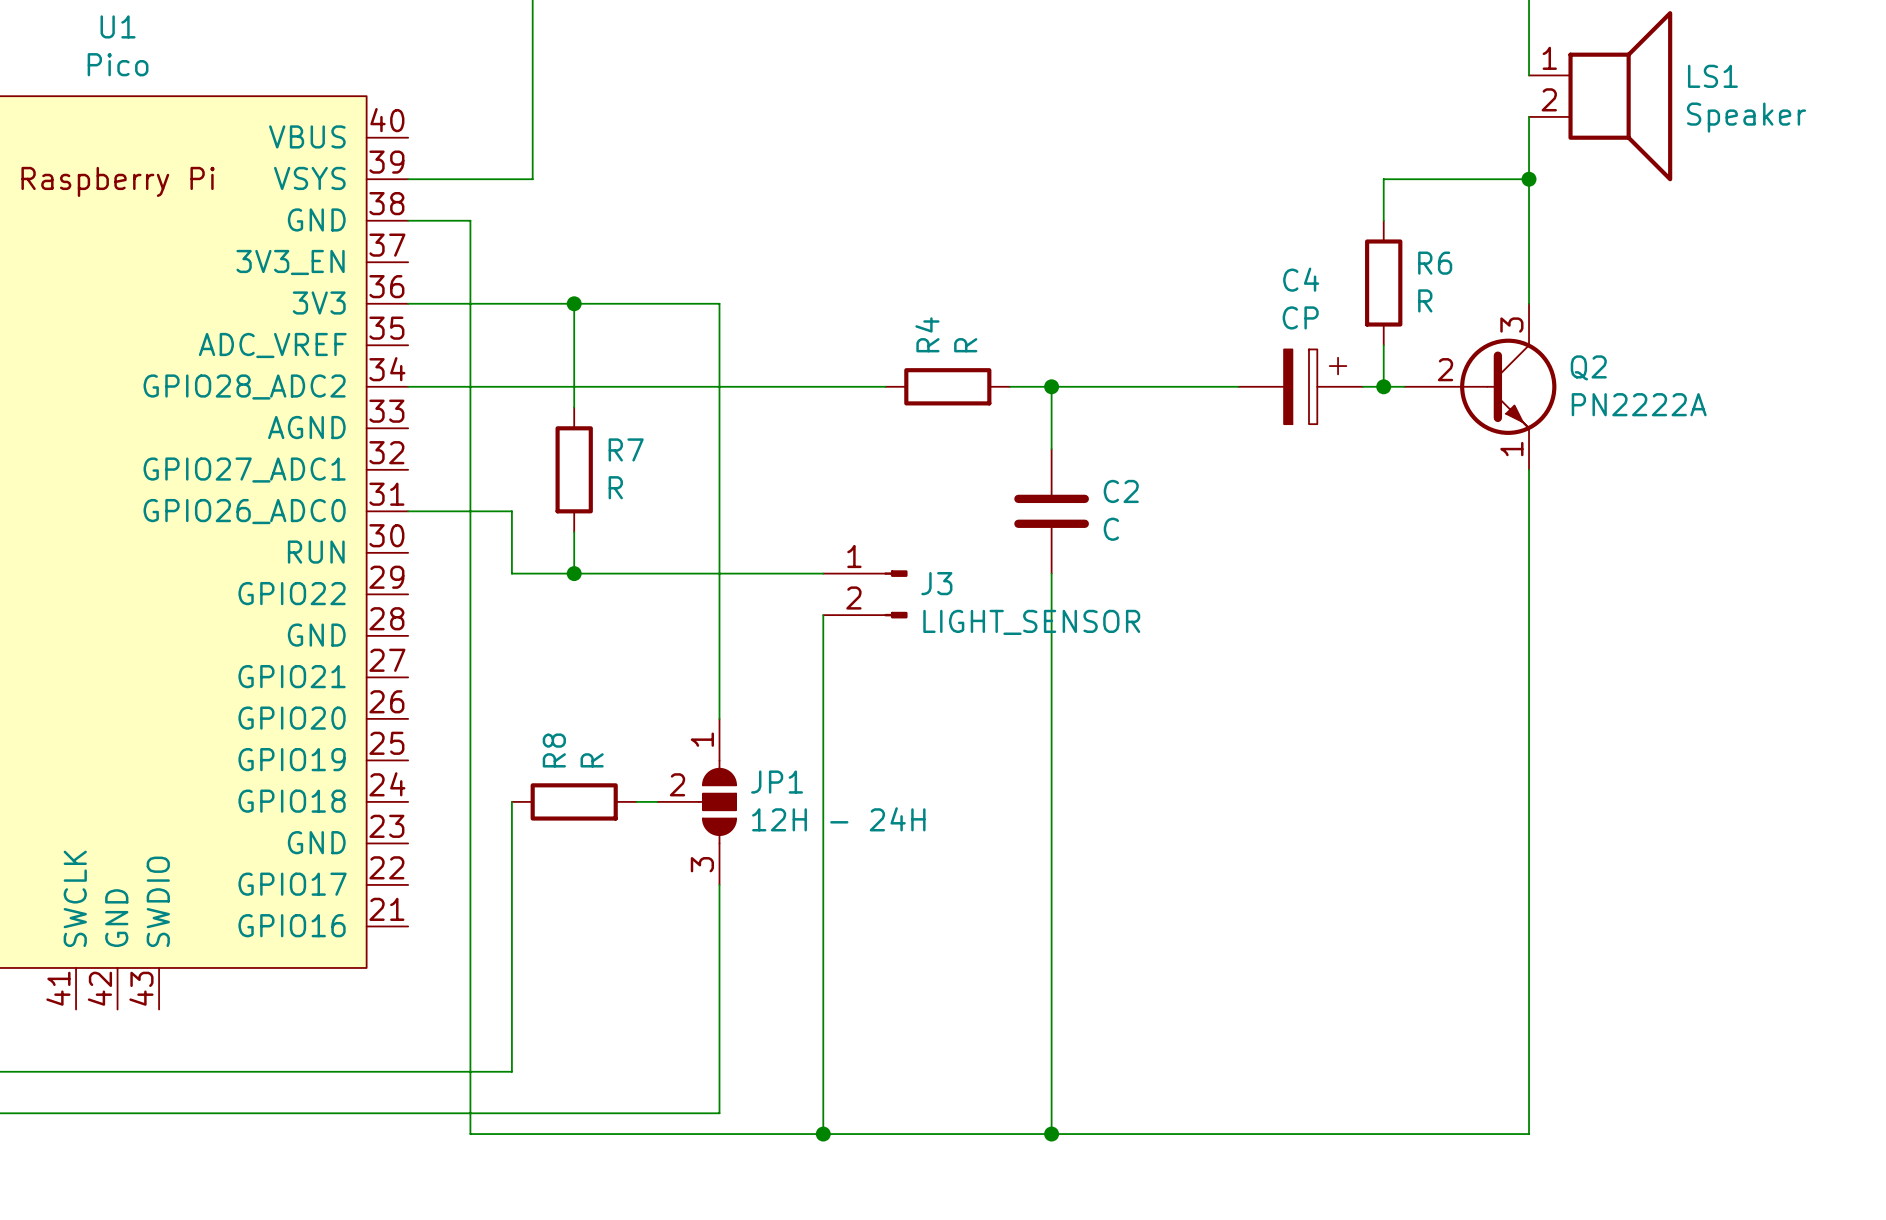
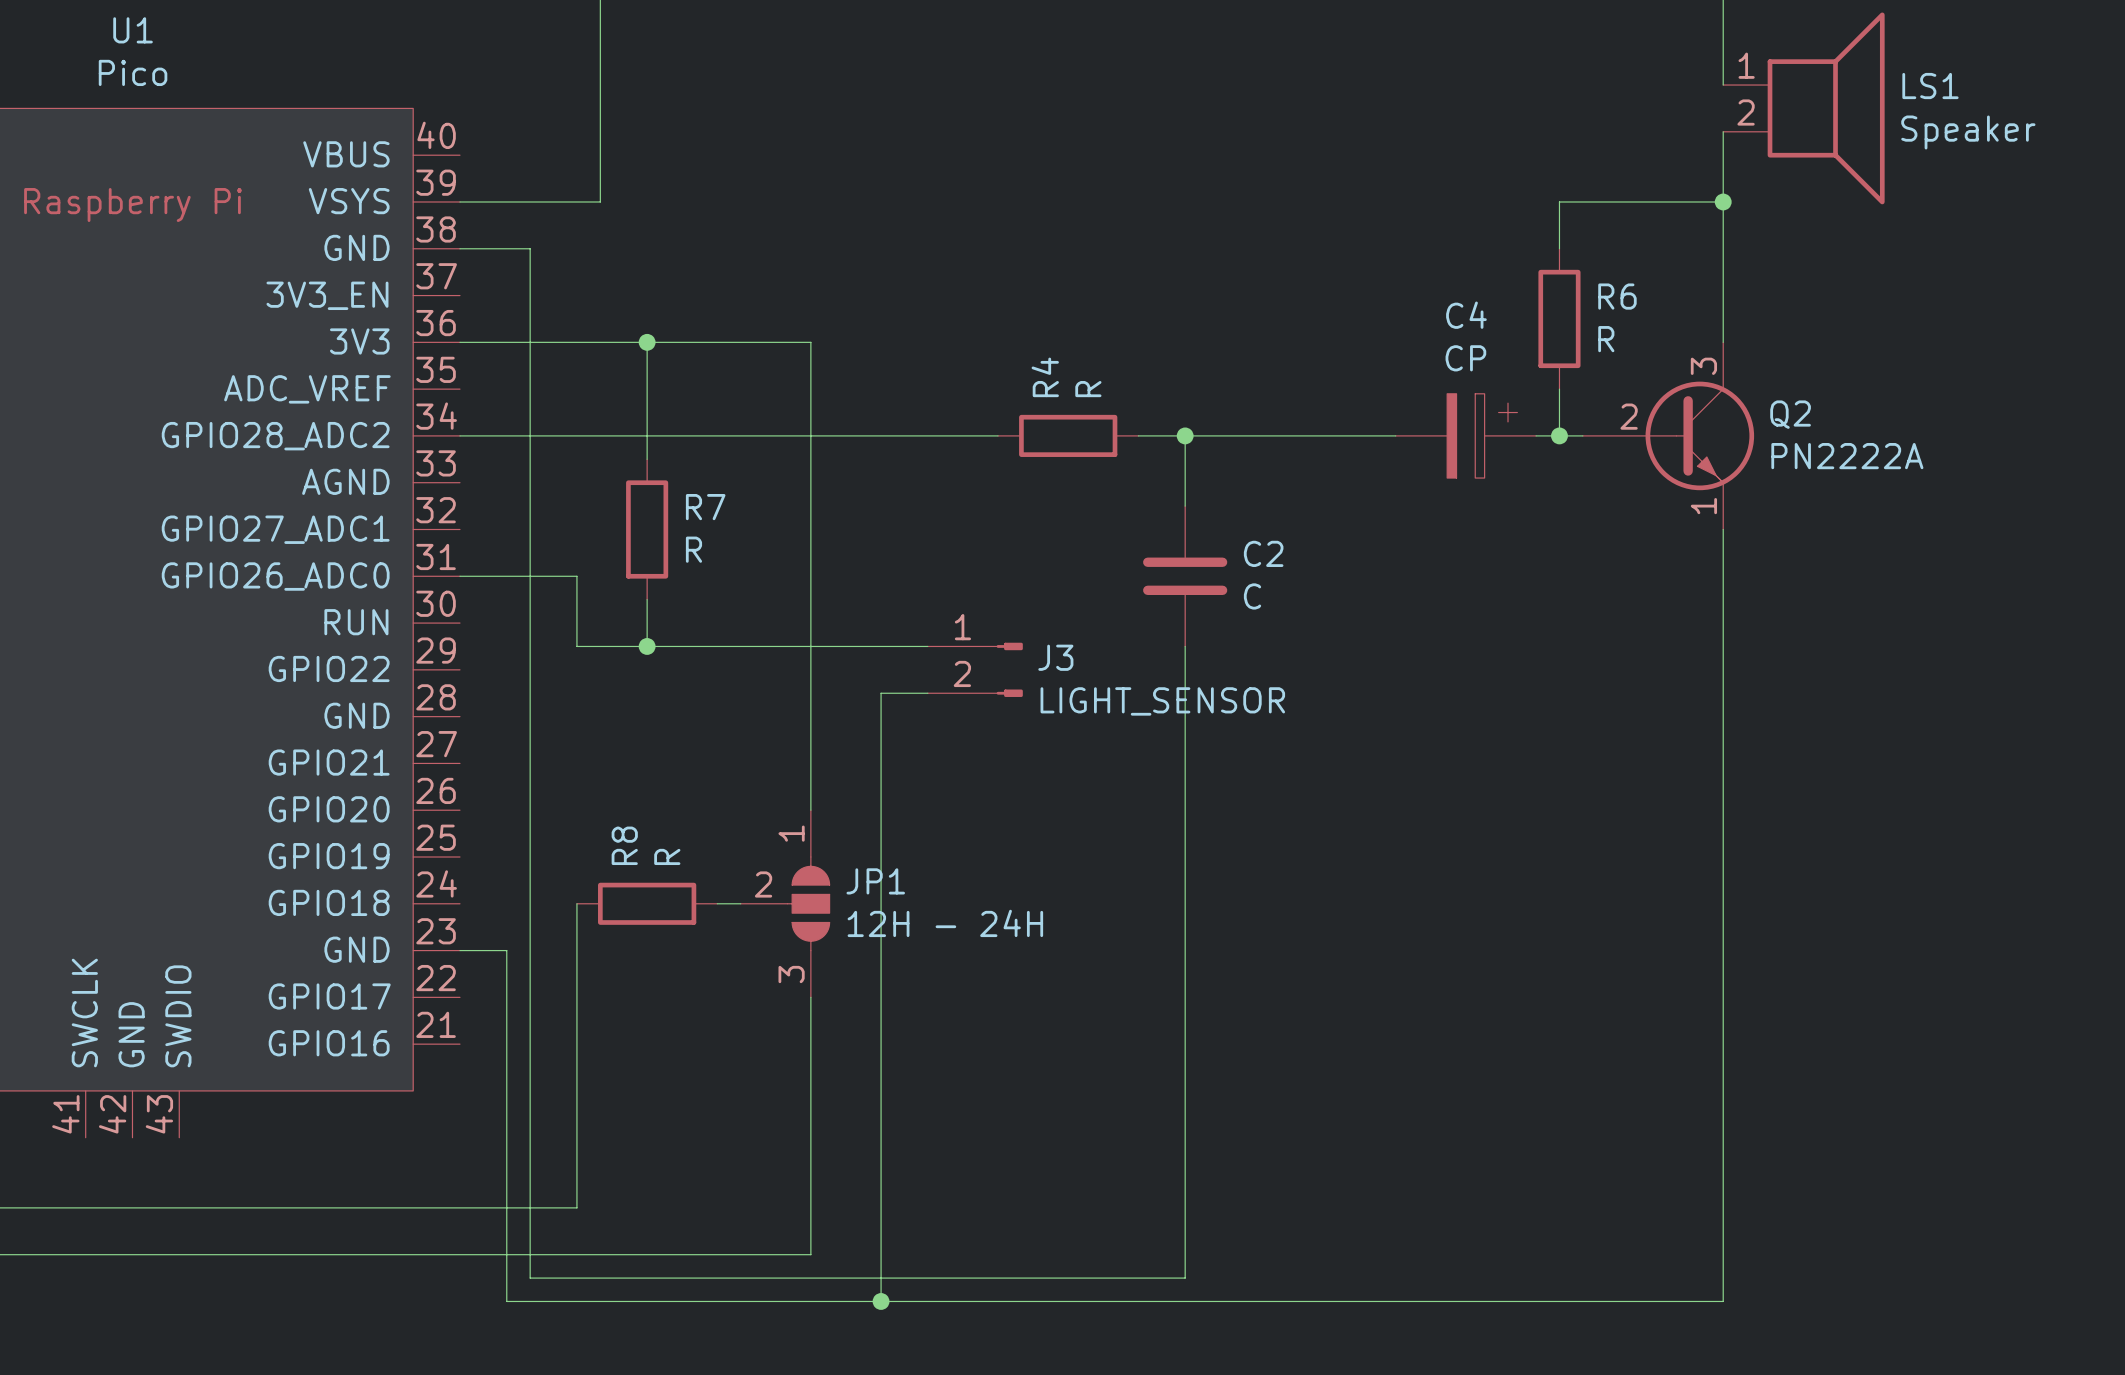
wire: (823, 615) (823, 1134) -> (927, 693) (881, 693) (881, 1301)
junction position: (823, 1134) -> (881, 1301)
wire: (1051, 1134) (1529, 1134) -> (459, 950) (506, 950) (506, 1301) (1723, 1301) (1723, 1278)
junction: (1051, 1134) -> none

